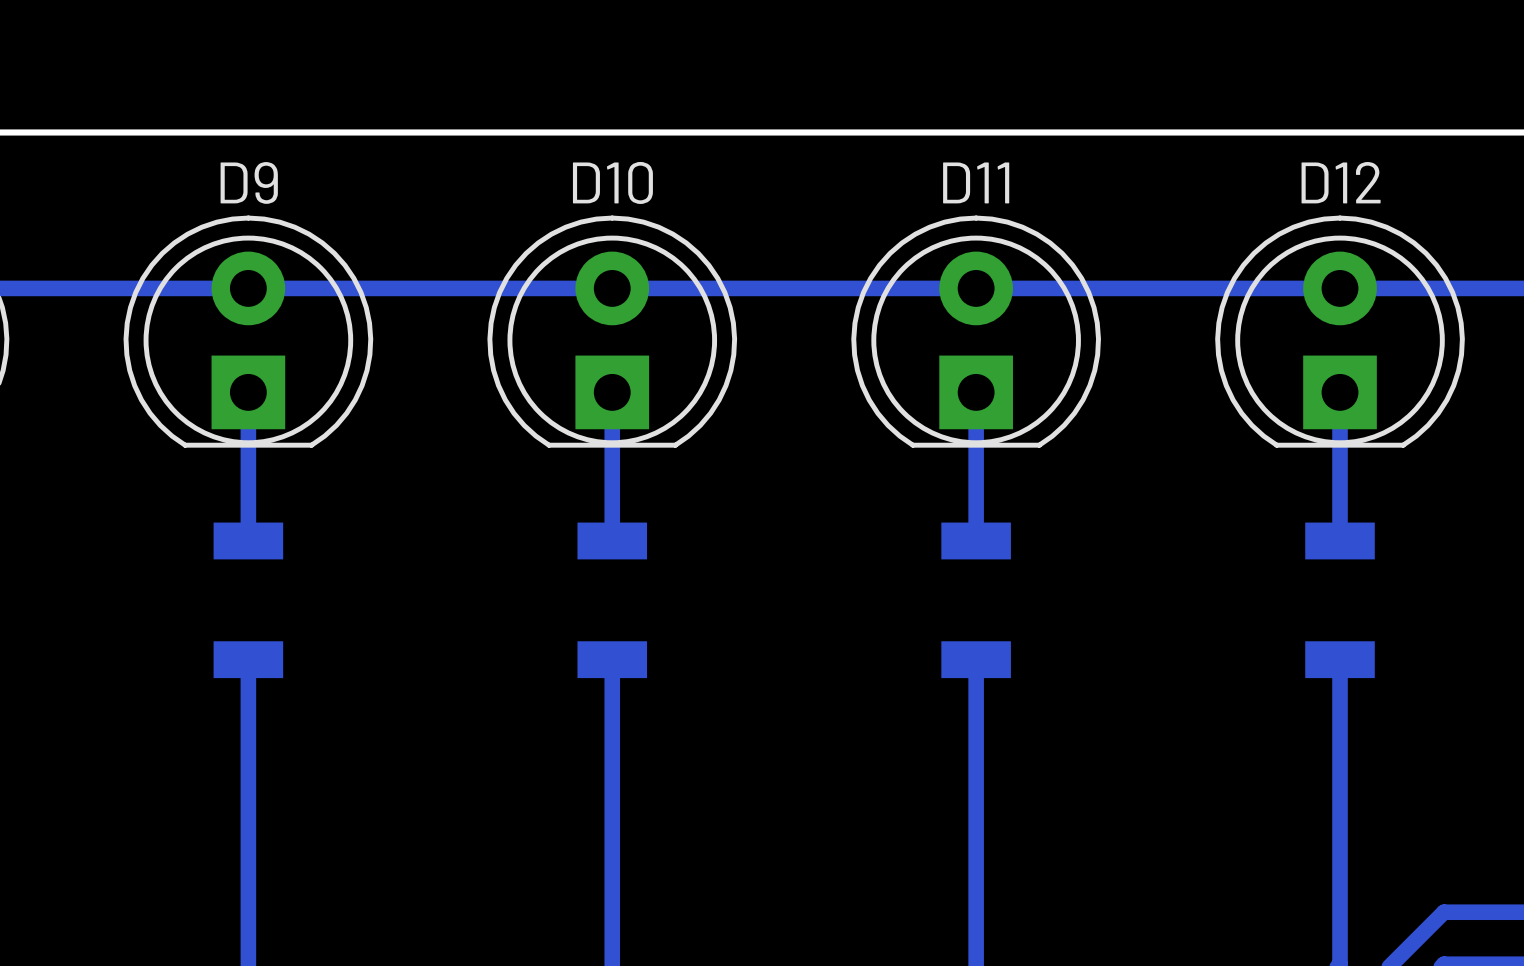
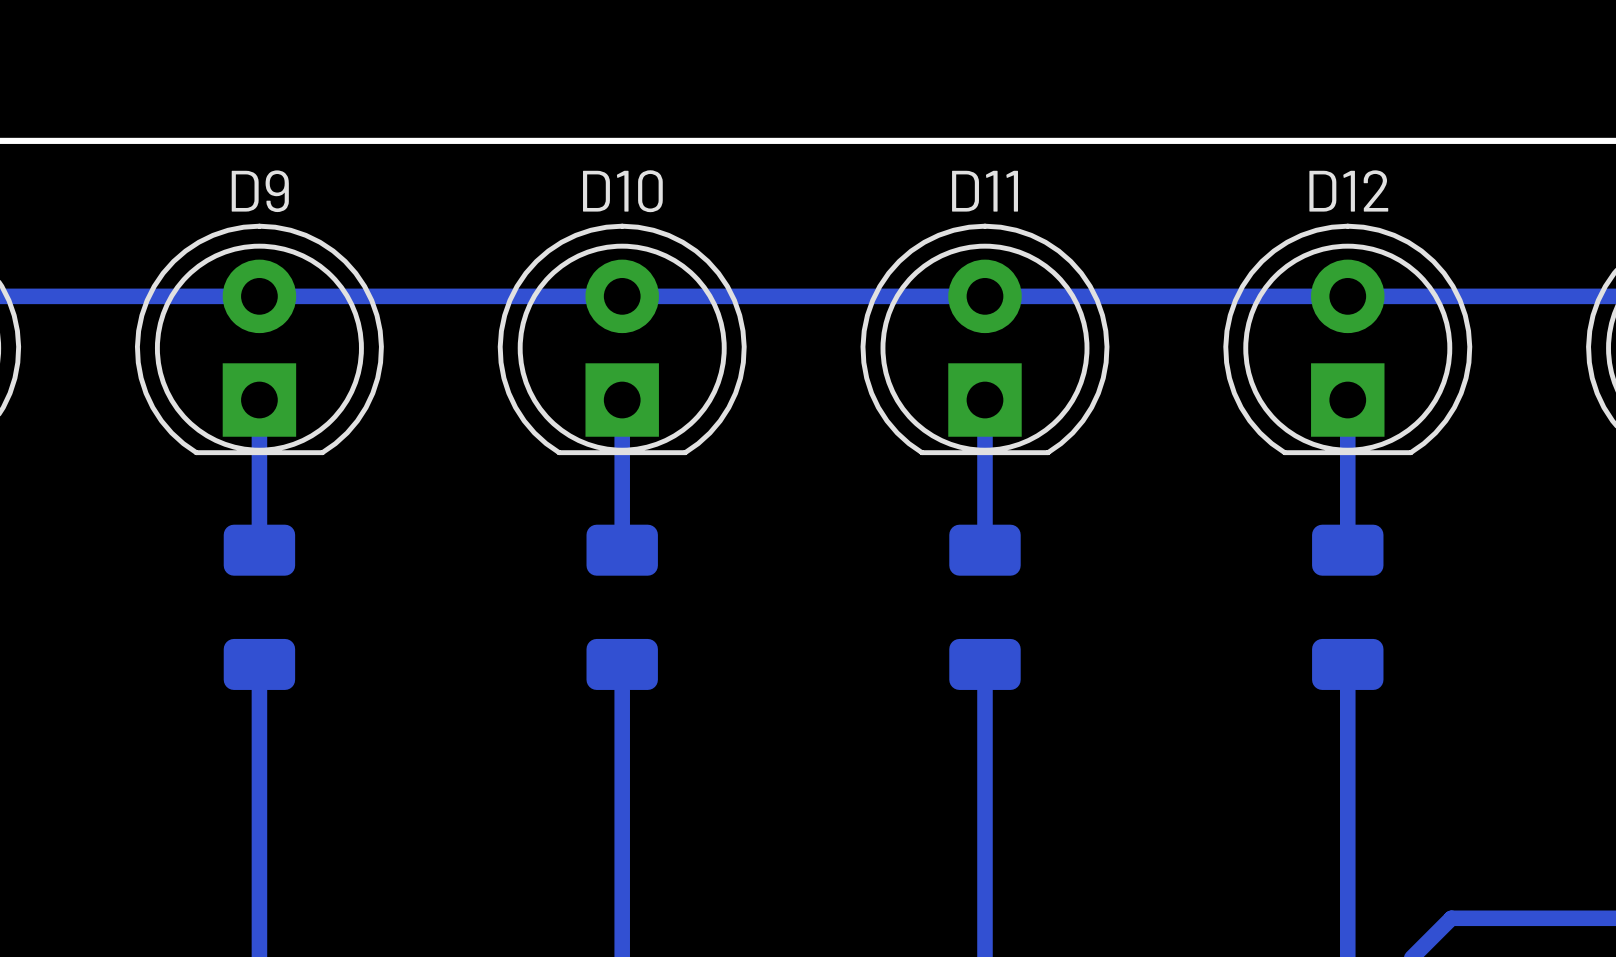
part footprint: [213, 522, 284, 679] -> [223, 524, 296, 690]
part footprint: [577, 522, 648, 679] -> [586, 524, 658, 690]
part footprint: [941, 522, 1011, 679] -> [949, 524, 1021, 690]
part footprint: [1305, 522, 1375, 679] -> [1312, 524, 1384, 690]

